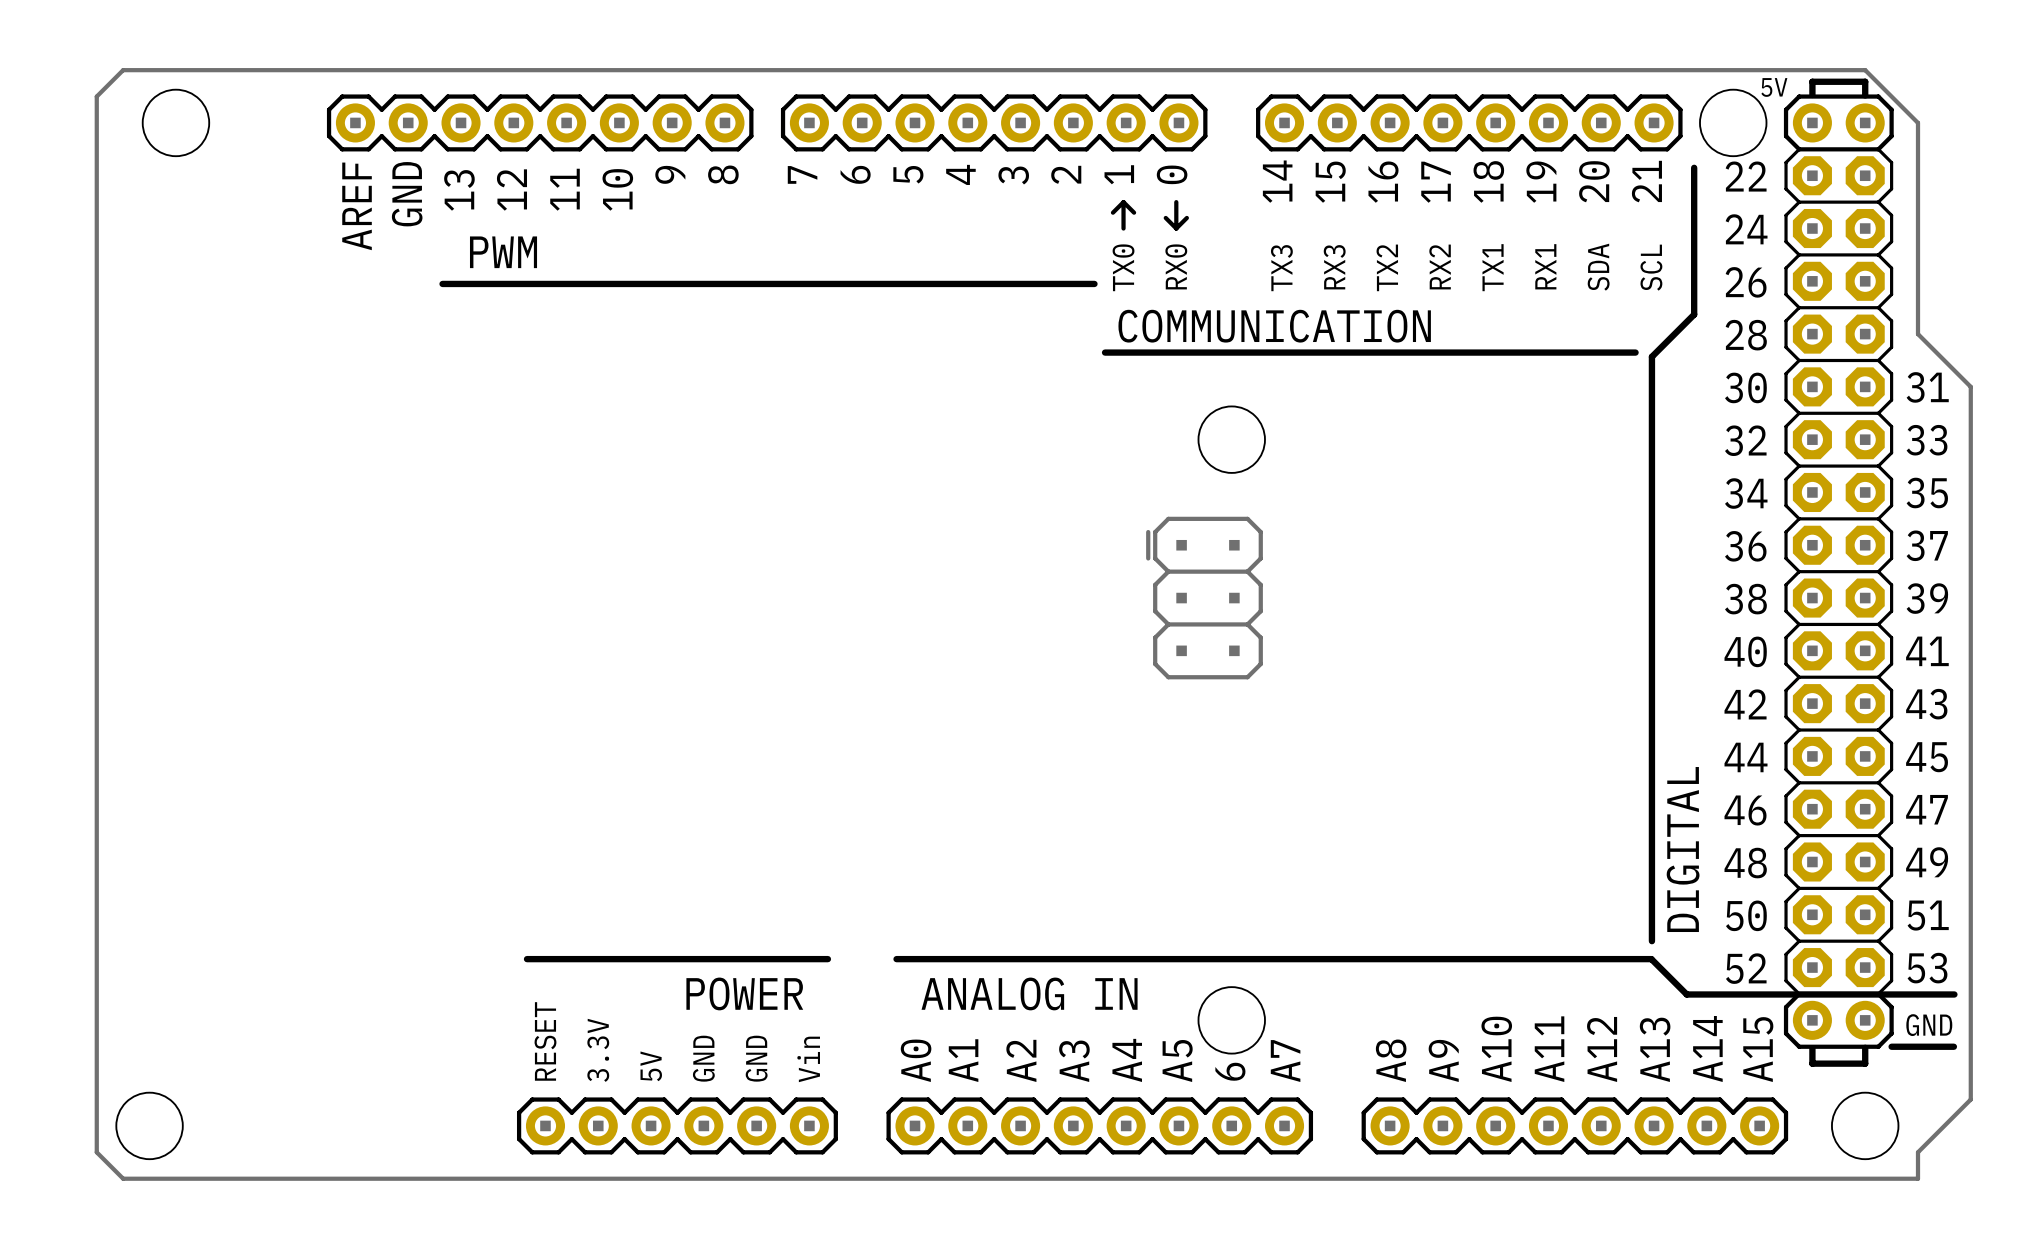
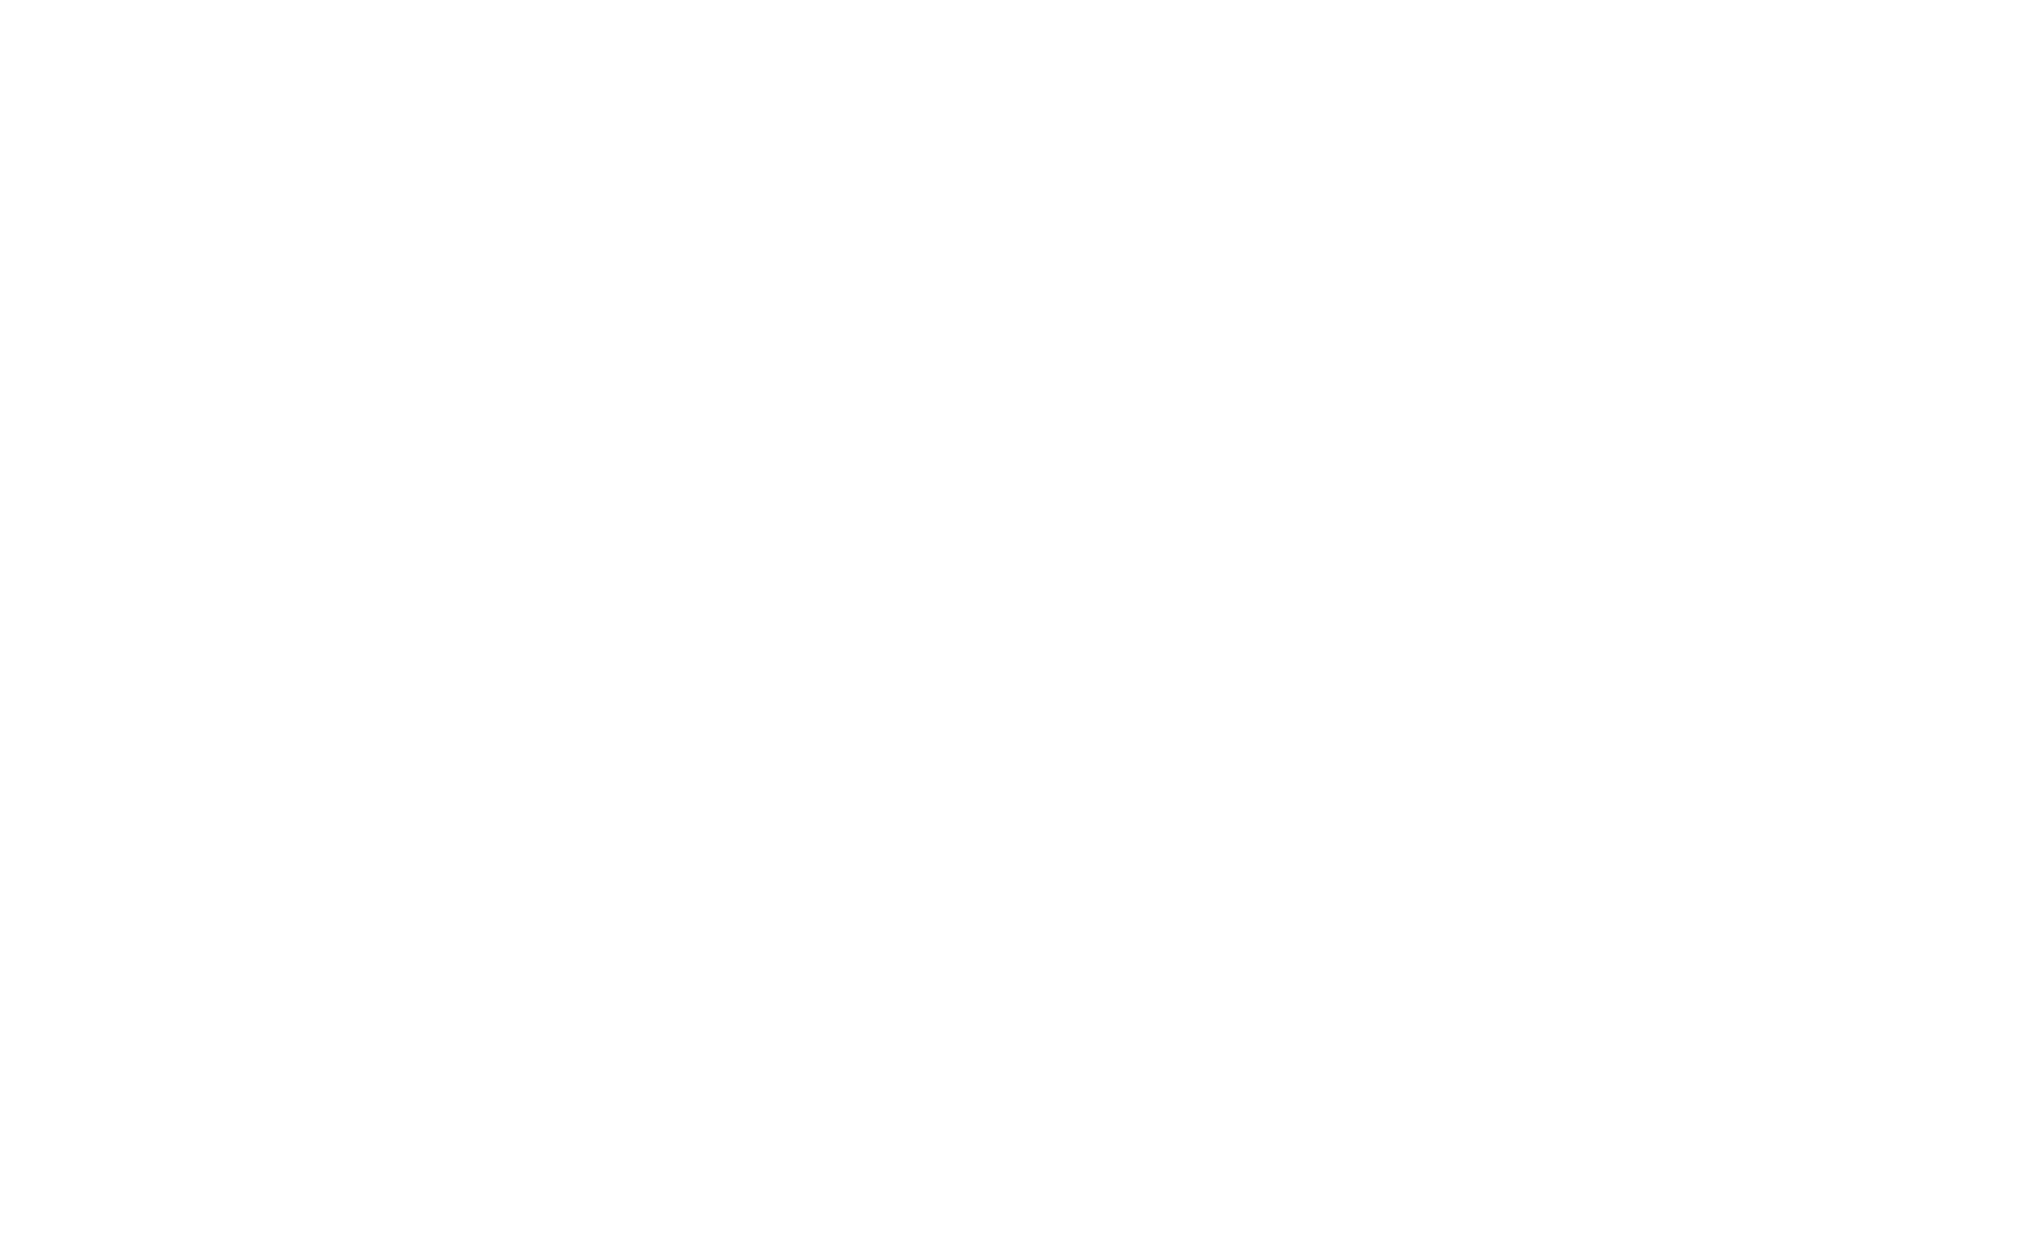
part: (1033, 624) -> none

